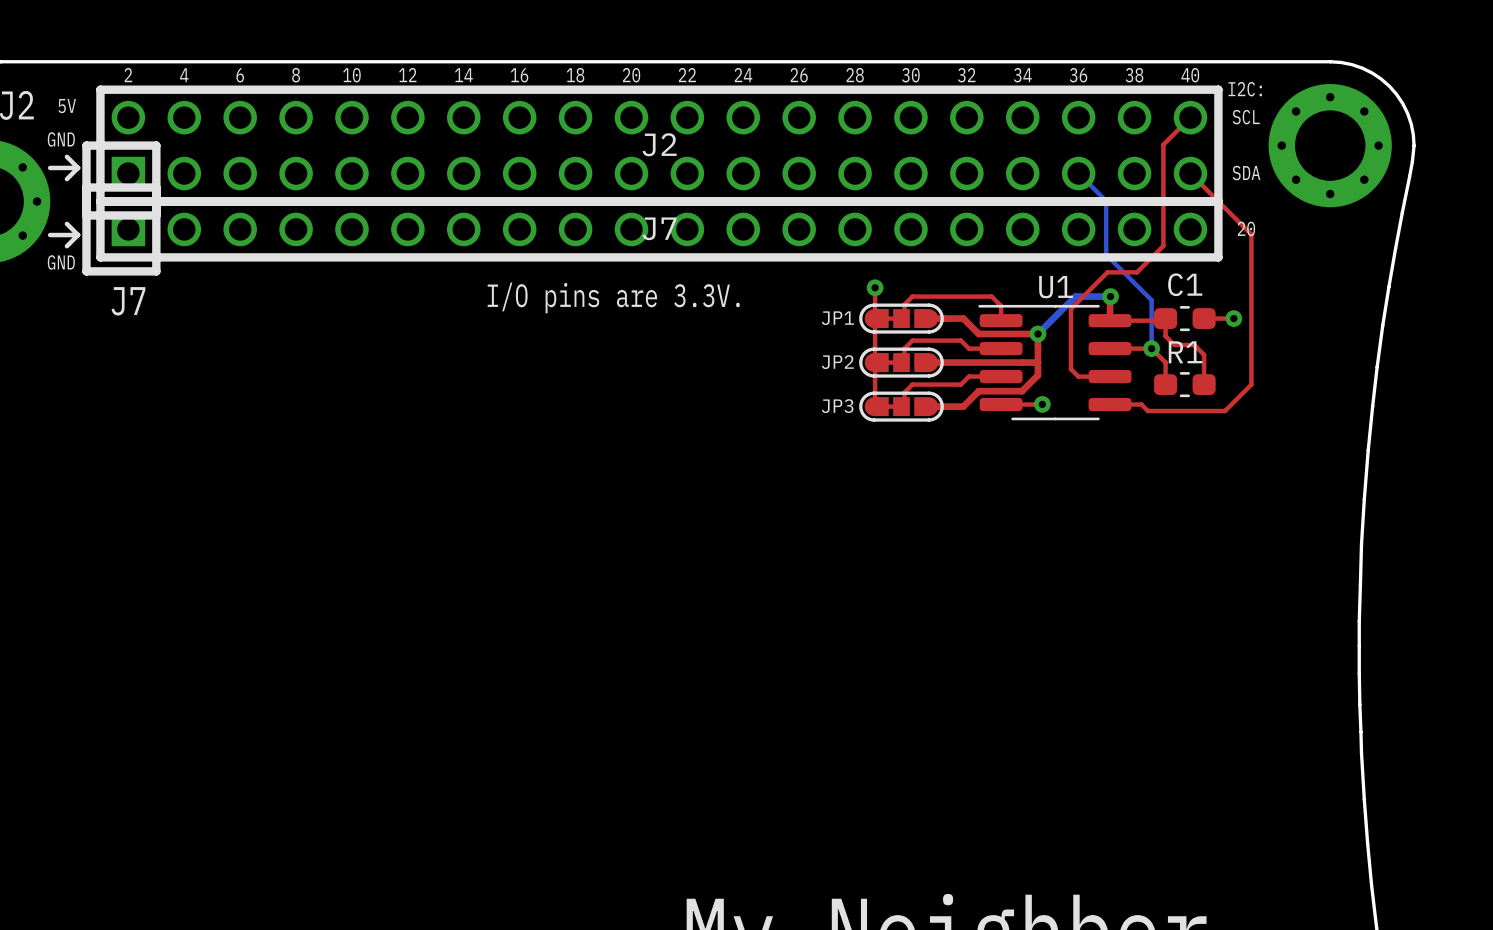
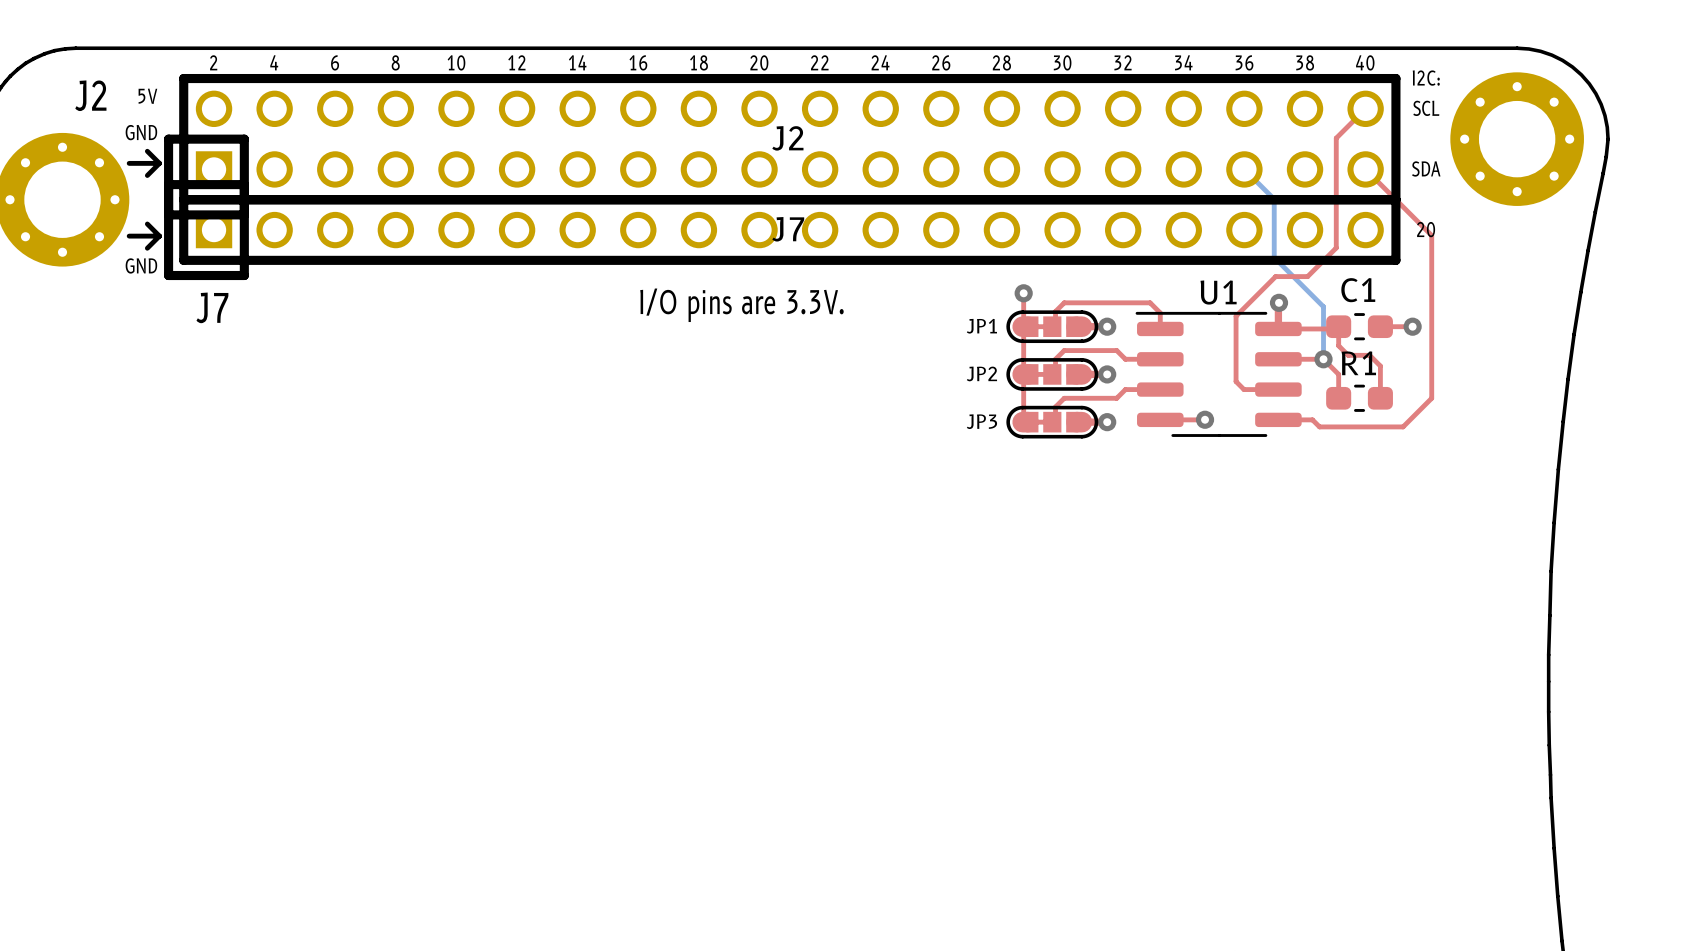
bottom track: (1110, 296) (1075, 296) (1037, 333) -> none
top track: (952, 318) (963, 318) (978, 333) (1037, 333) (1037, 375) (1022, 391) (978, 391) (963, 406) (952, 406) -> none
via: none -> (1107, 326)
via: (1037, 333) -> none
top track: (952, 362) (1037, 362) -> none
via: none -> (1107, 374)
via: none -> (1107, 422)

